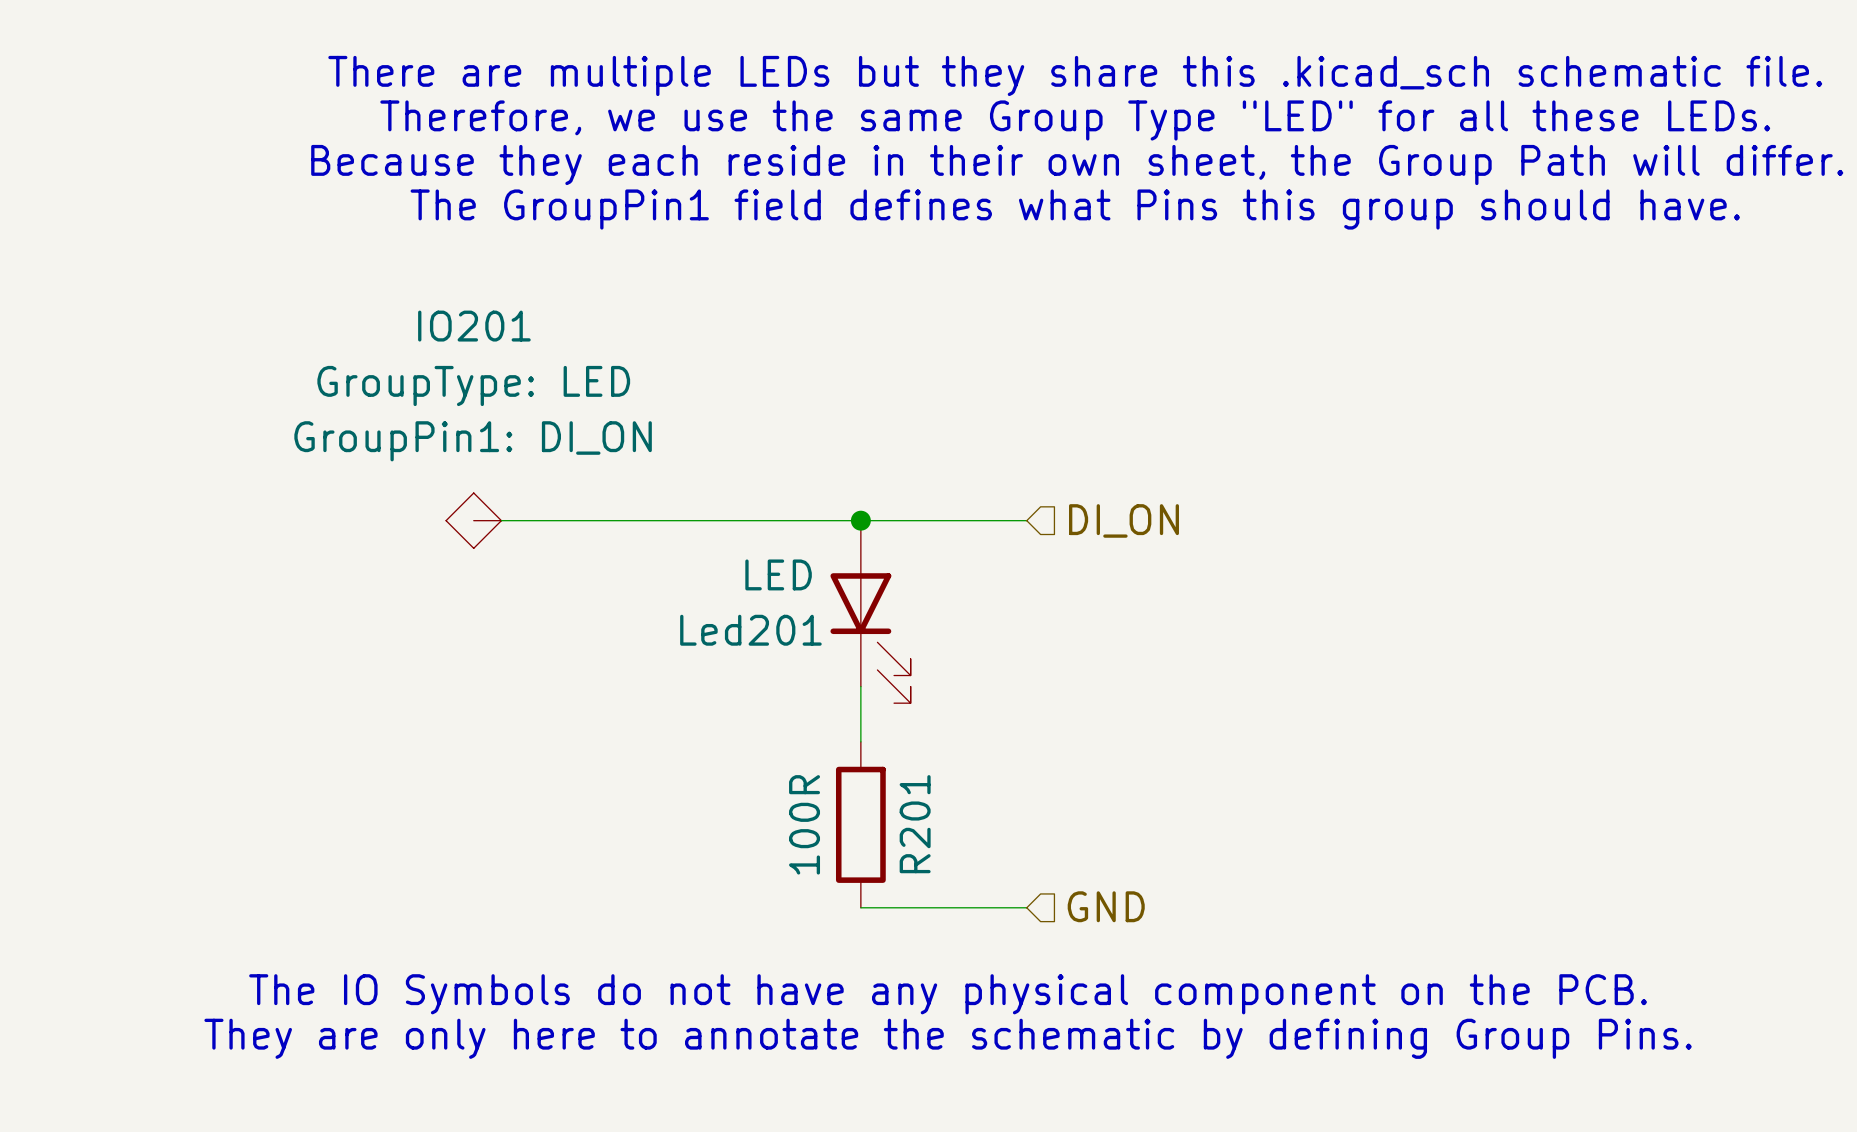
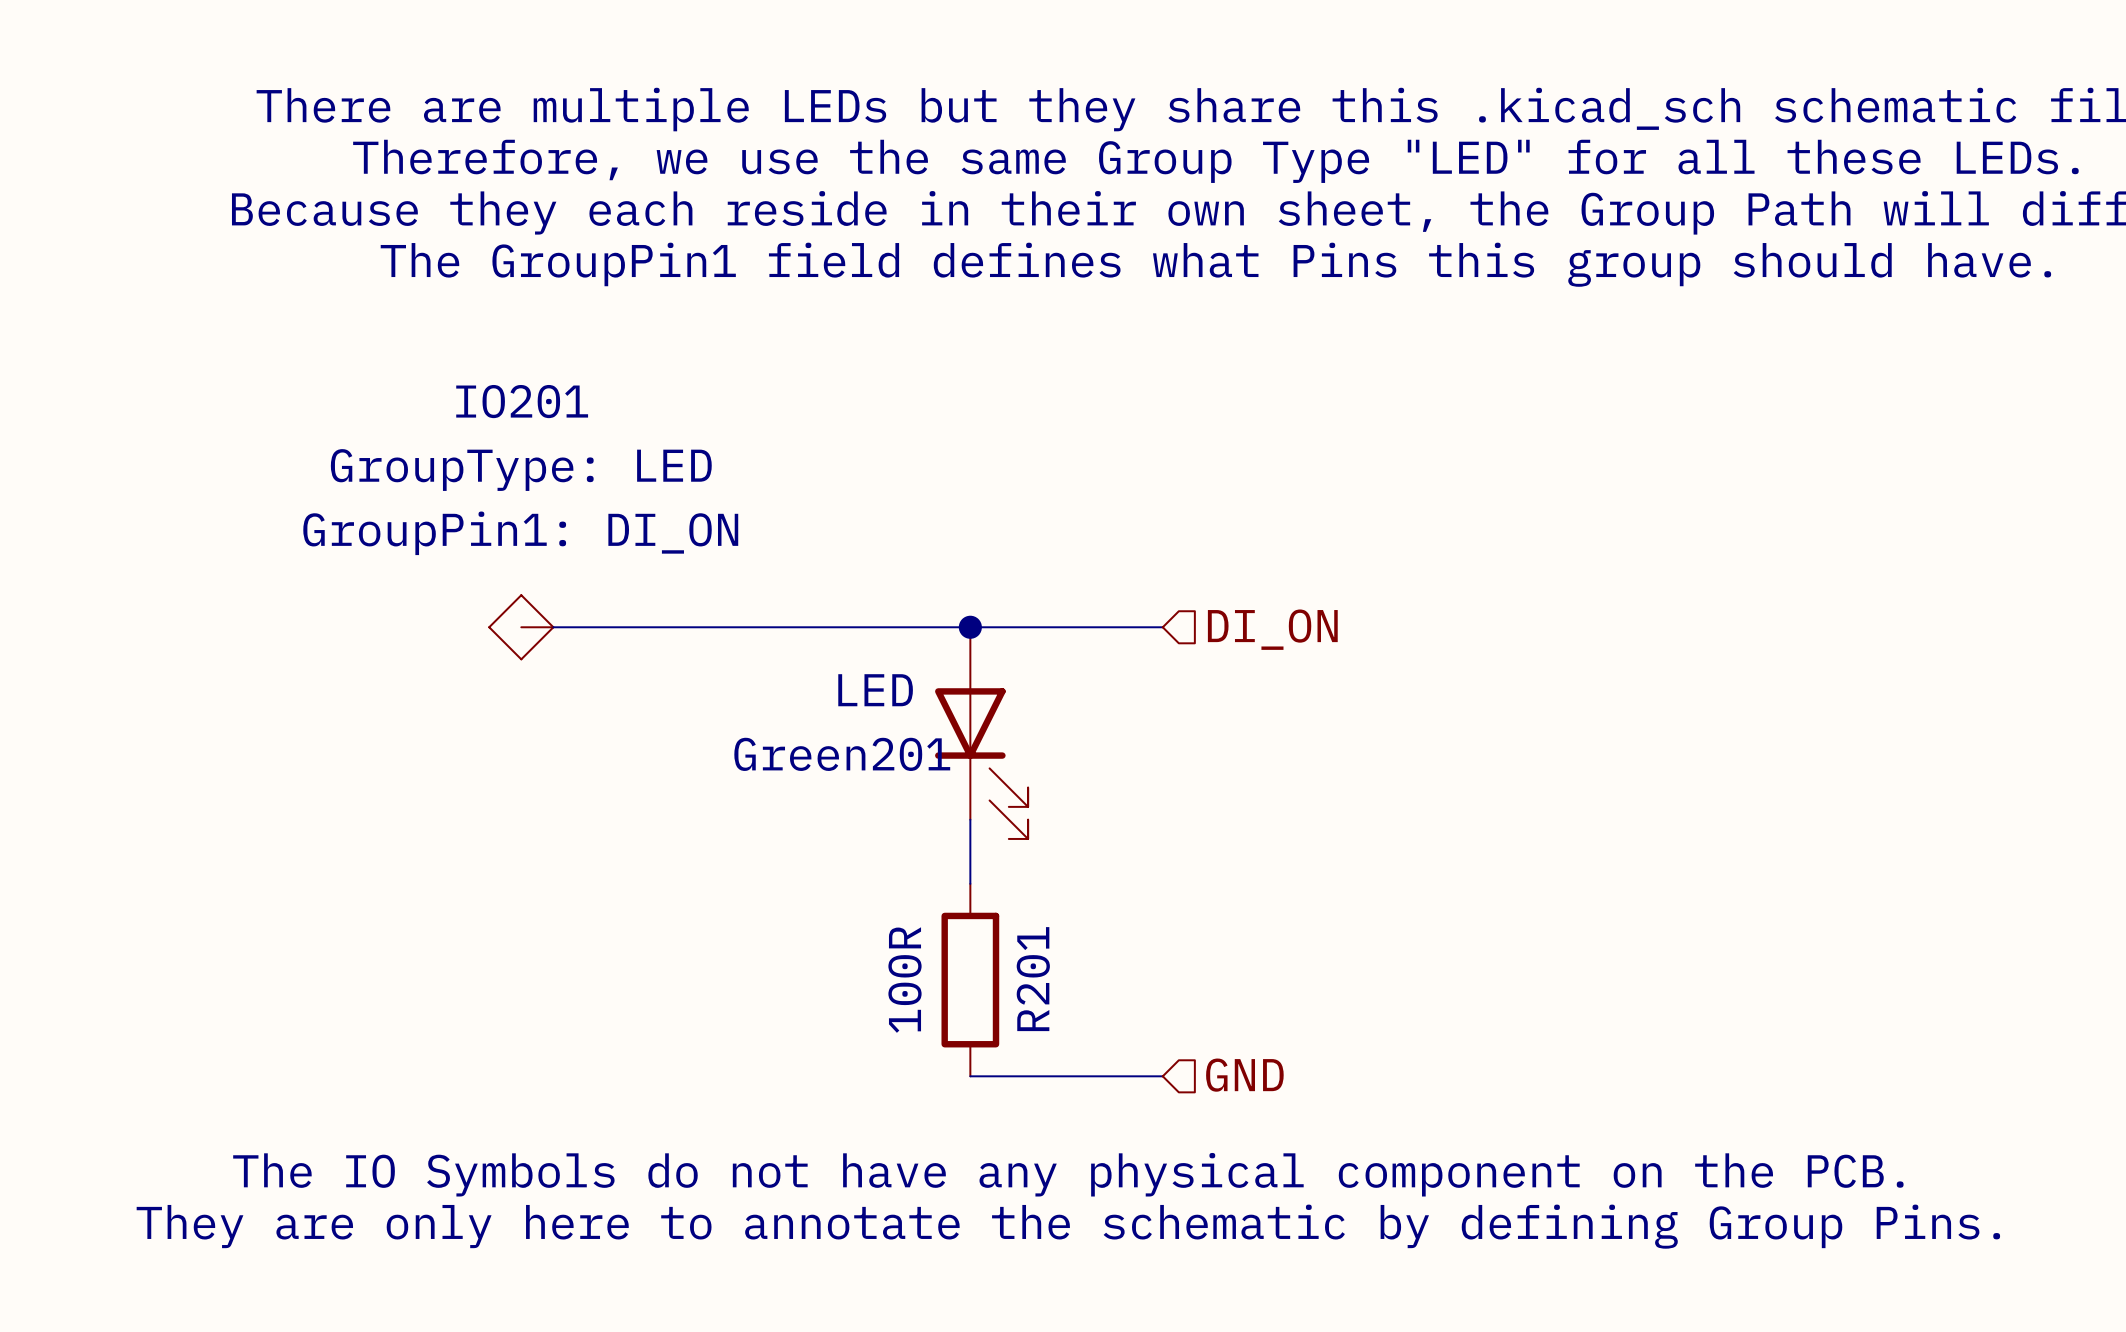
Led201 name: Led201 (750, 630) -> Green201 (842, 754)

